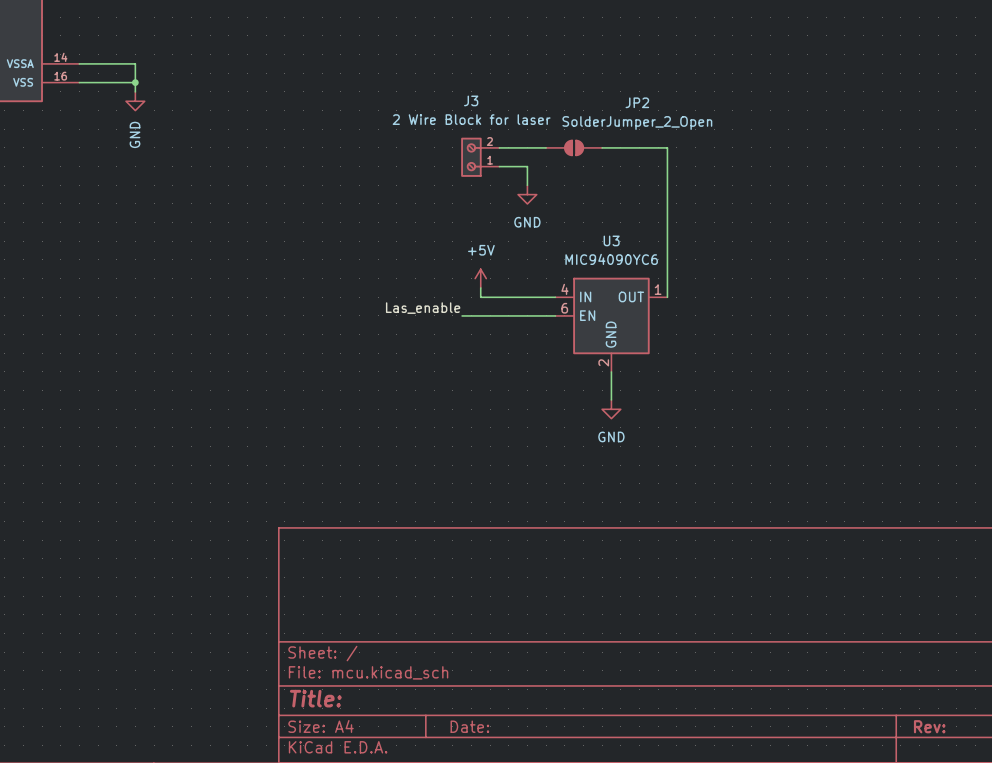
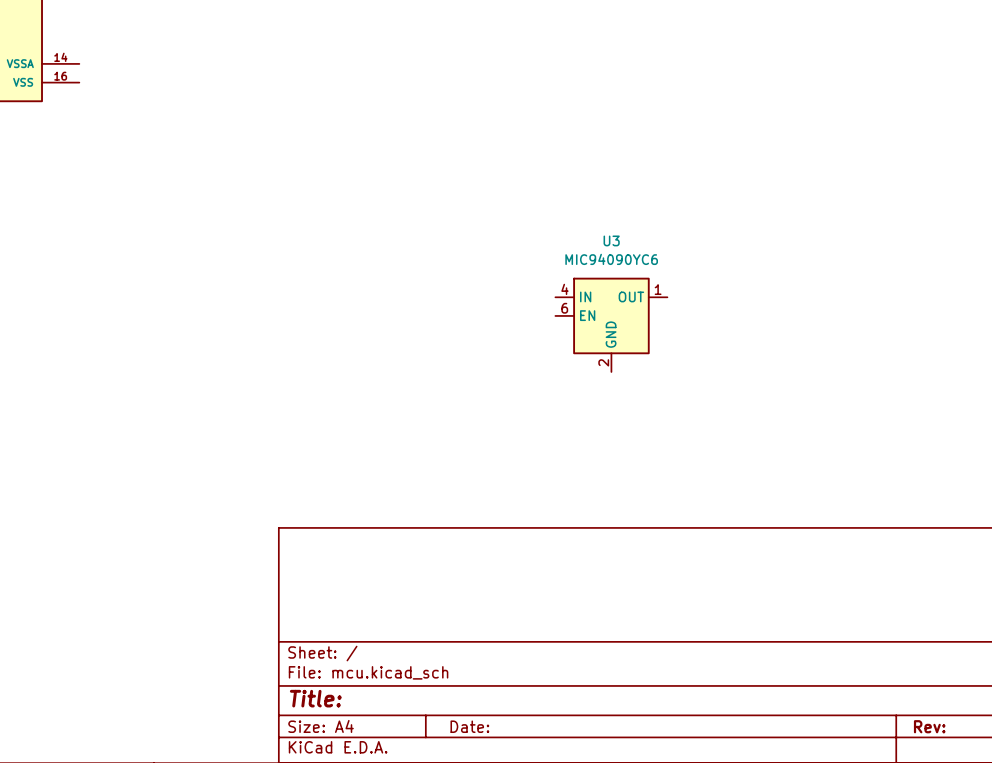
wire: (79, 63) (135, 63) (135, 91) -> none
wire: (79, 82) (135, 82) -> none
junction: (135, 82) -> none
power symbol: GND (135, 101) -> none
wire: (499, 147) (546, 147) -> none
JP2: SolderJumper_2_Open (574, 147) -> none
wire: (602, 147) (667, 147) (667, 297) -> none
J3: 2 Wire Block for laser (480, 157) -> none
wire: (499, 166) (527, 166) (527, 185) -> none
power symbol: GND (527, 194) -> none
power symbol: +5V (480, 278) -> none
wire: (480, 287) (480, 297) (555, 297) -> none
label: Las_enable (423, 308) -> none
wire: (462, 315) (555, 315) -> none
wire: (611, 371) (611, 399) -> none
power symbol: GND (611, 409) -> none

